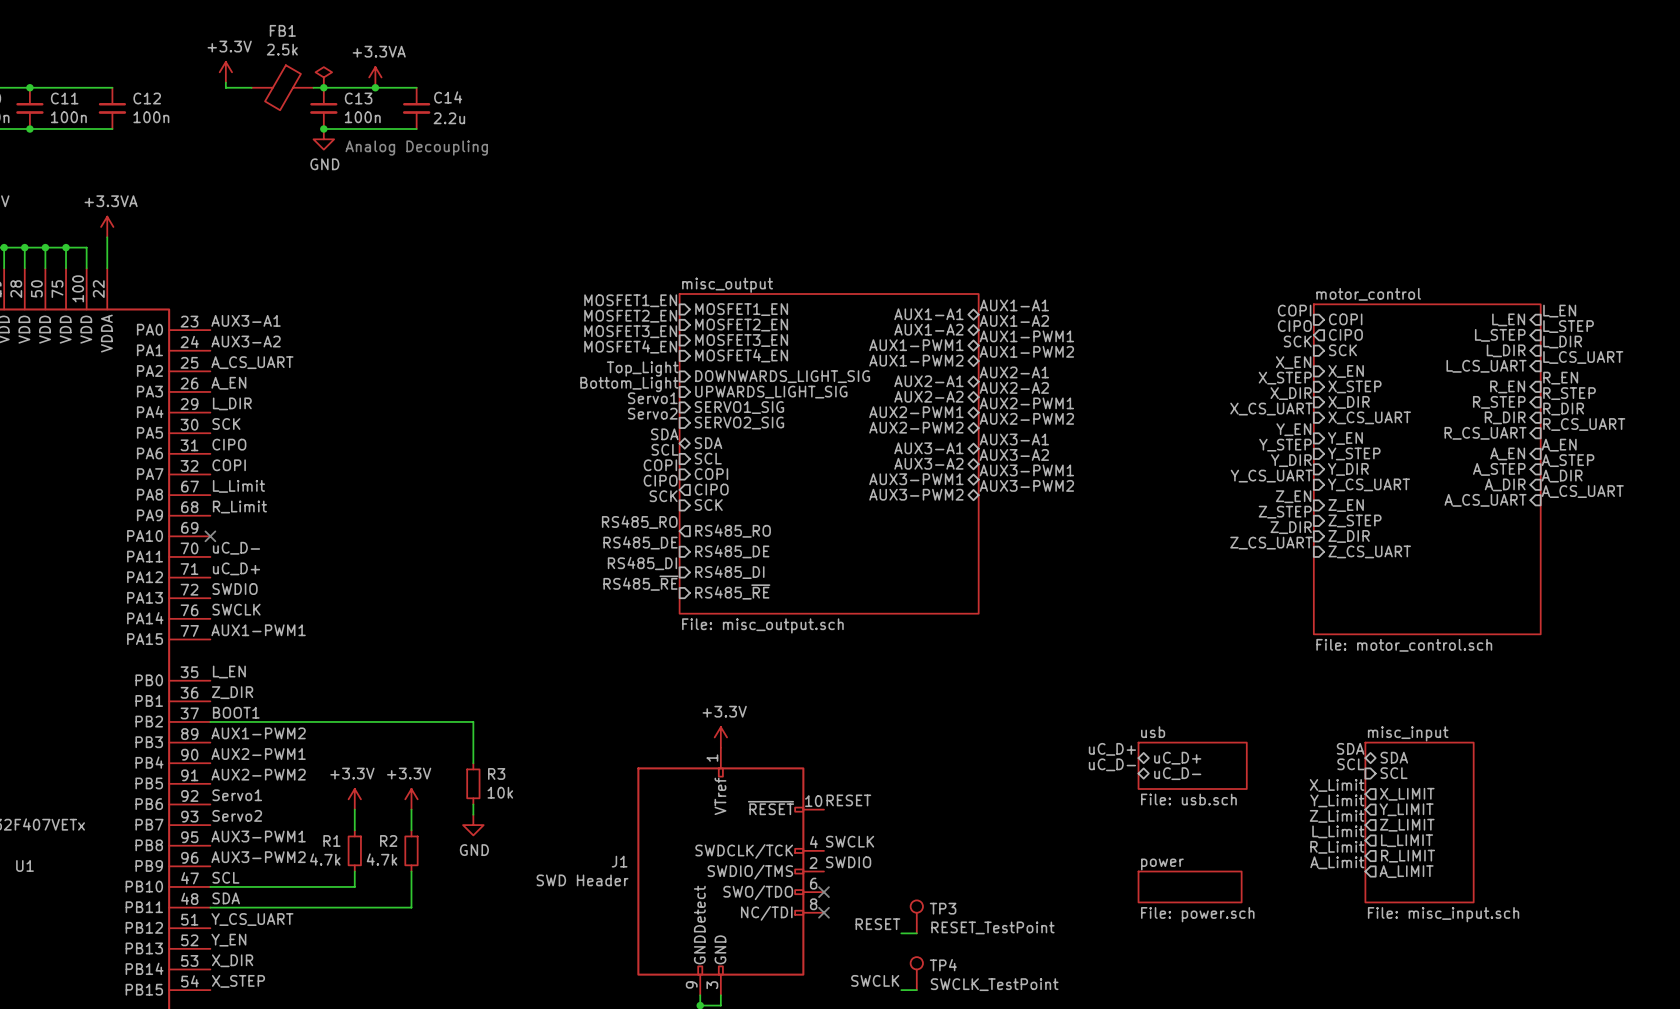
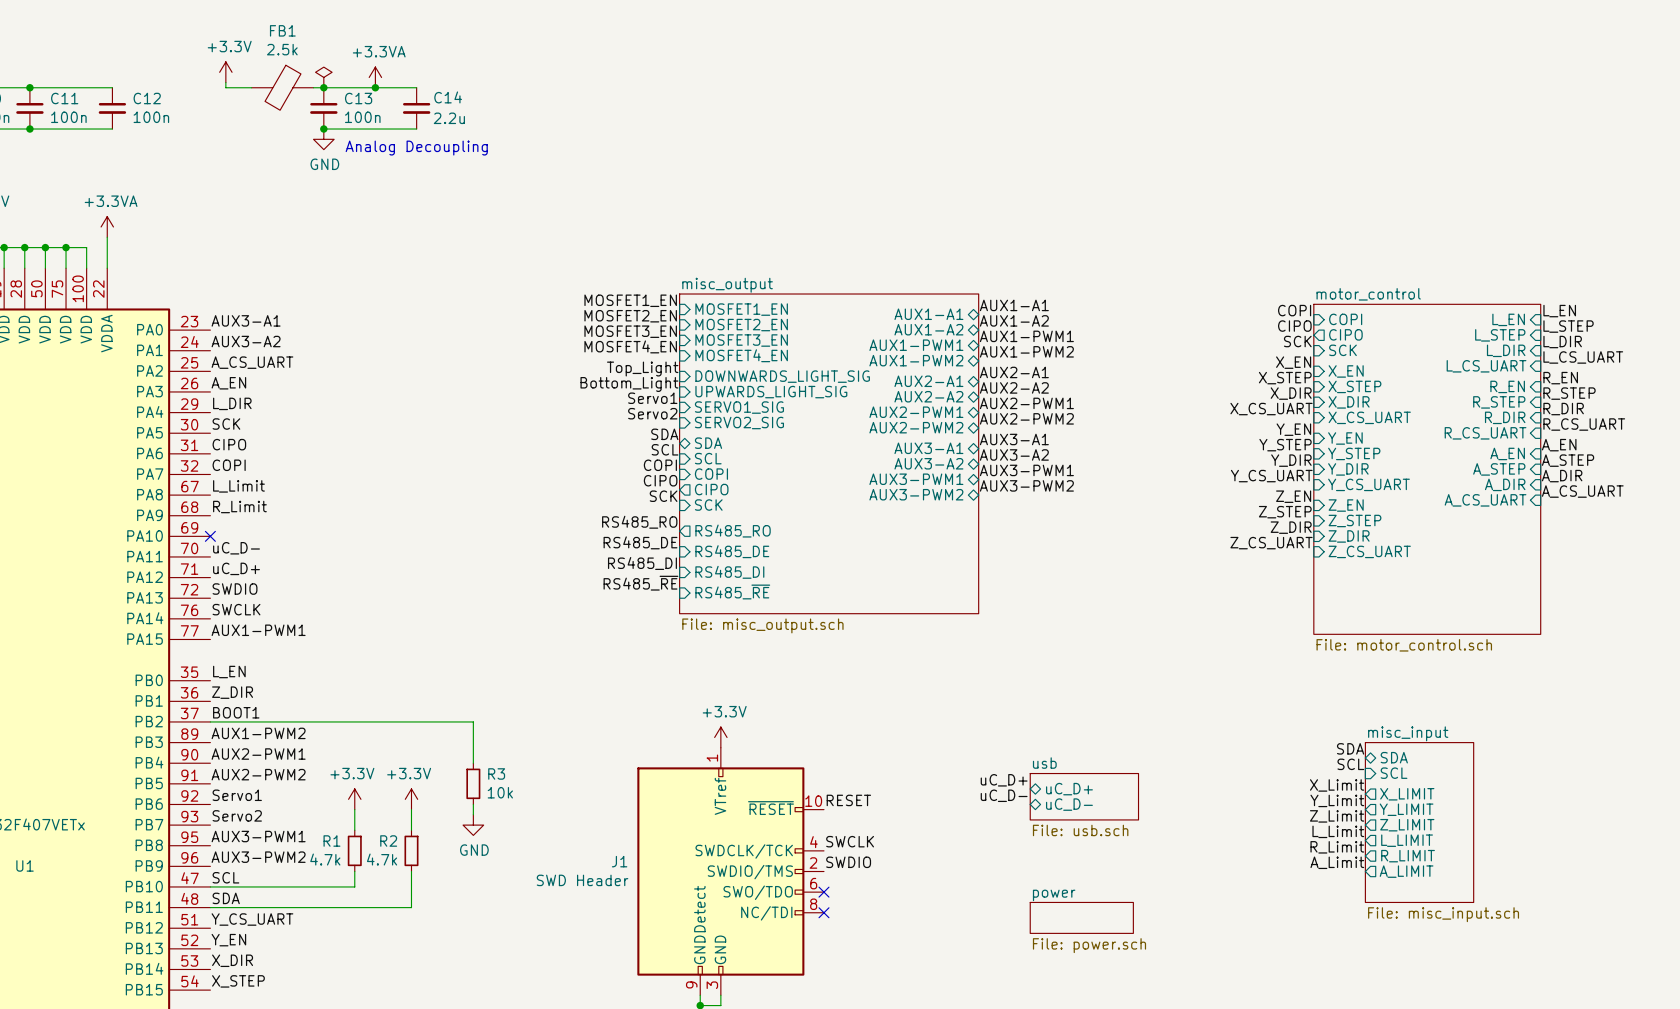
label position: uC_D+ (1112, 749) -> uC_D+ (1004, 780)
sheet pin position: uC_D+ (1177, 758) -> uC_D+ (1069, 789)
label position: uC_D- (1112, 764) -> uC_D- (1004, 795)
sheet usb position: (1192, 765) -> (1084, 796)
sheet pin position: uC_D- (1177, 773) -> uC_D- (1069, 804)
sheet power position: (1190, 886) -> (1081, 917)
TP3: RESET_TestPoint (916, 916) -> none
label: RESET (877, 924) -> none
wire: (901, 933) (916, 933) -> none
TP4: SWCLK_TestPoint (916, 973) -> none
label: SWCLK (875, 980) -> none
wire: (901, 990) (916, 990) -> none

